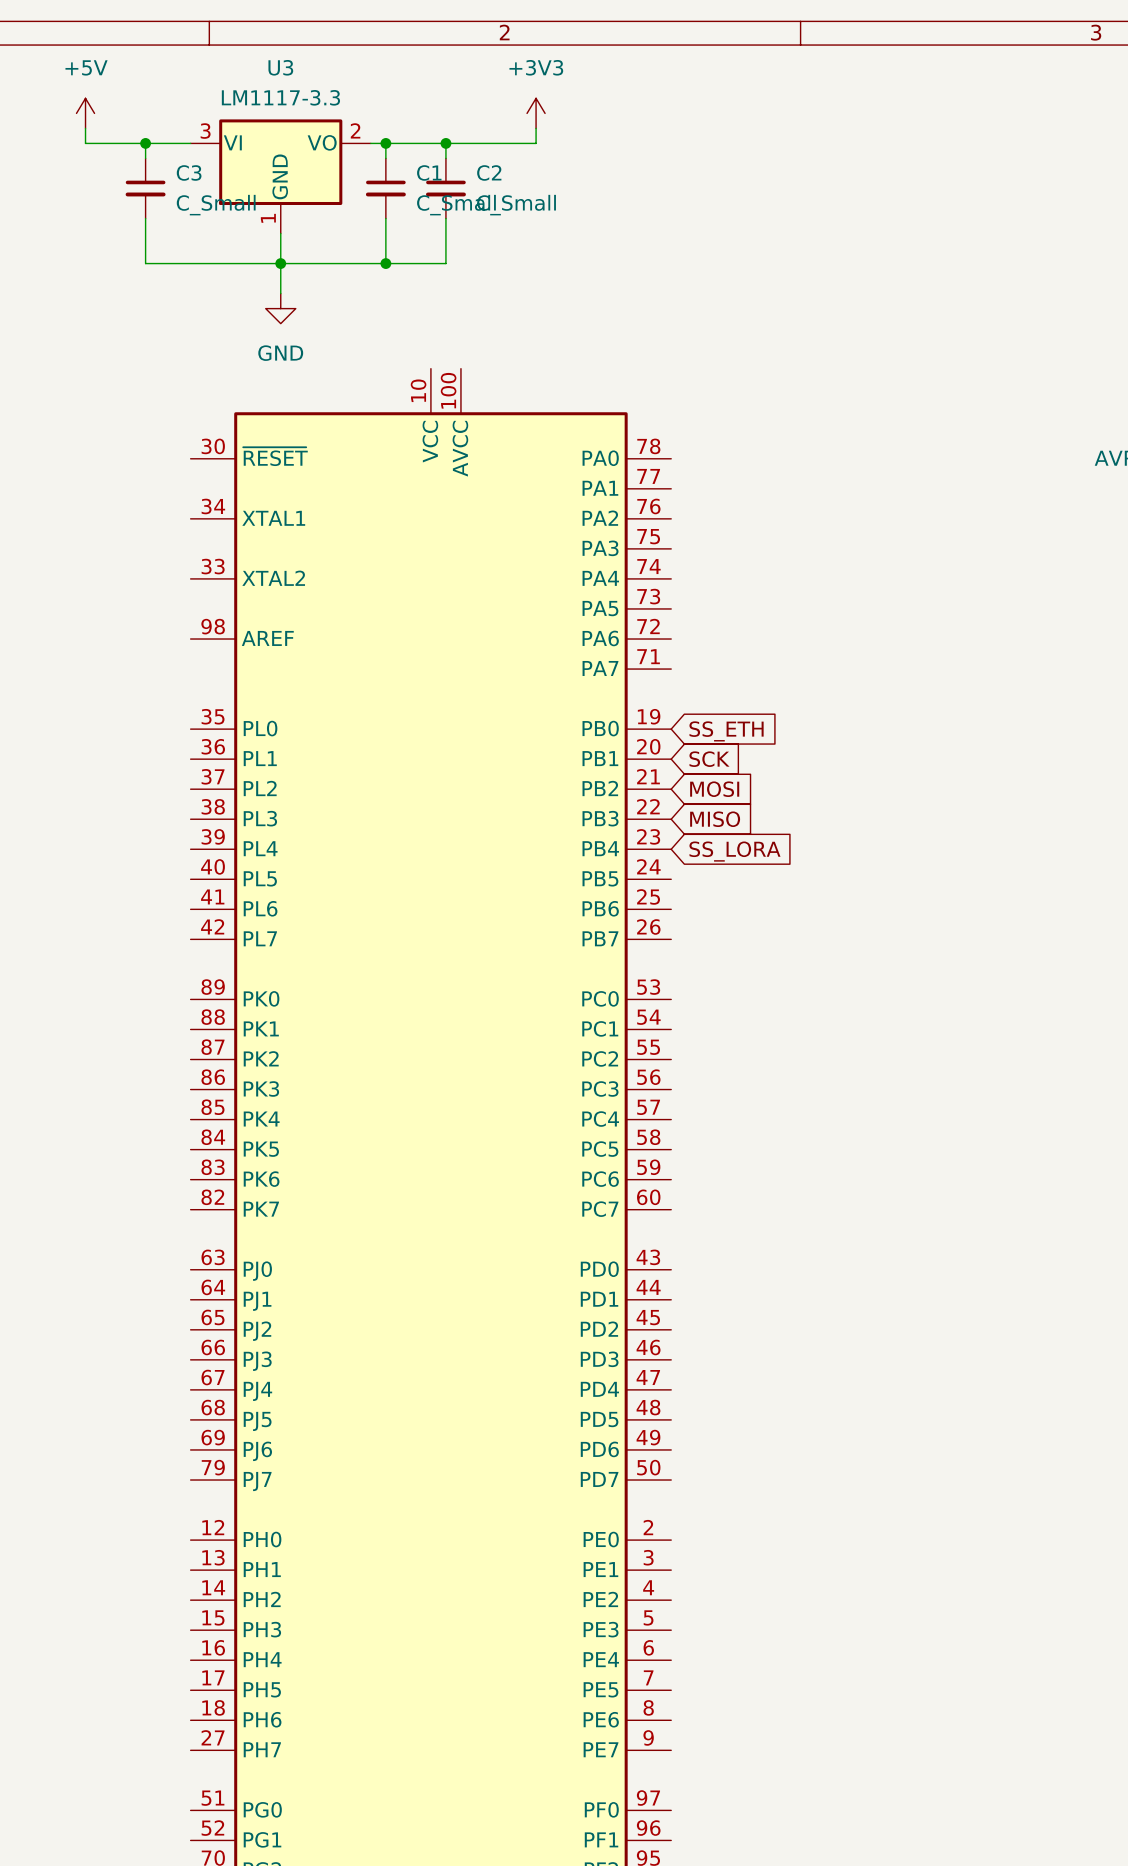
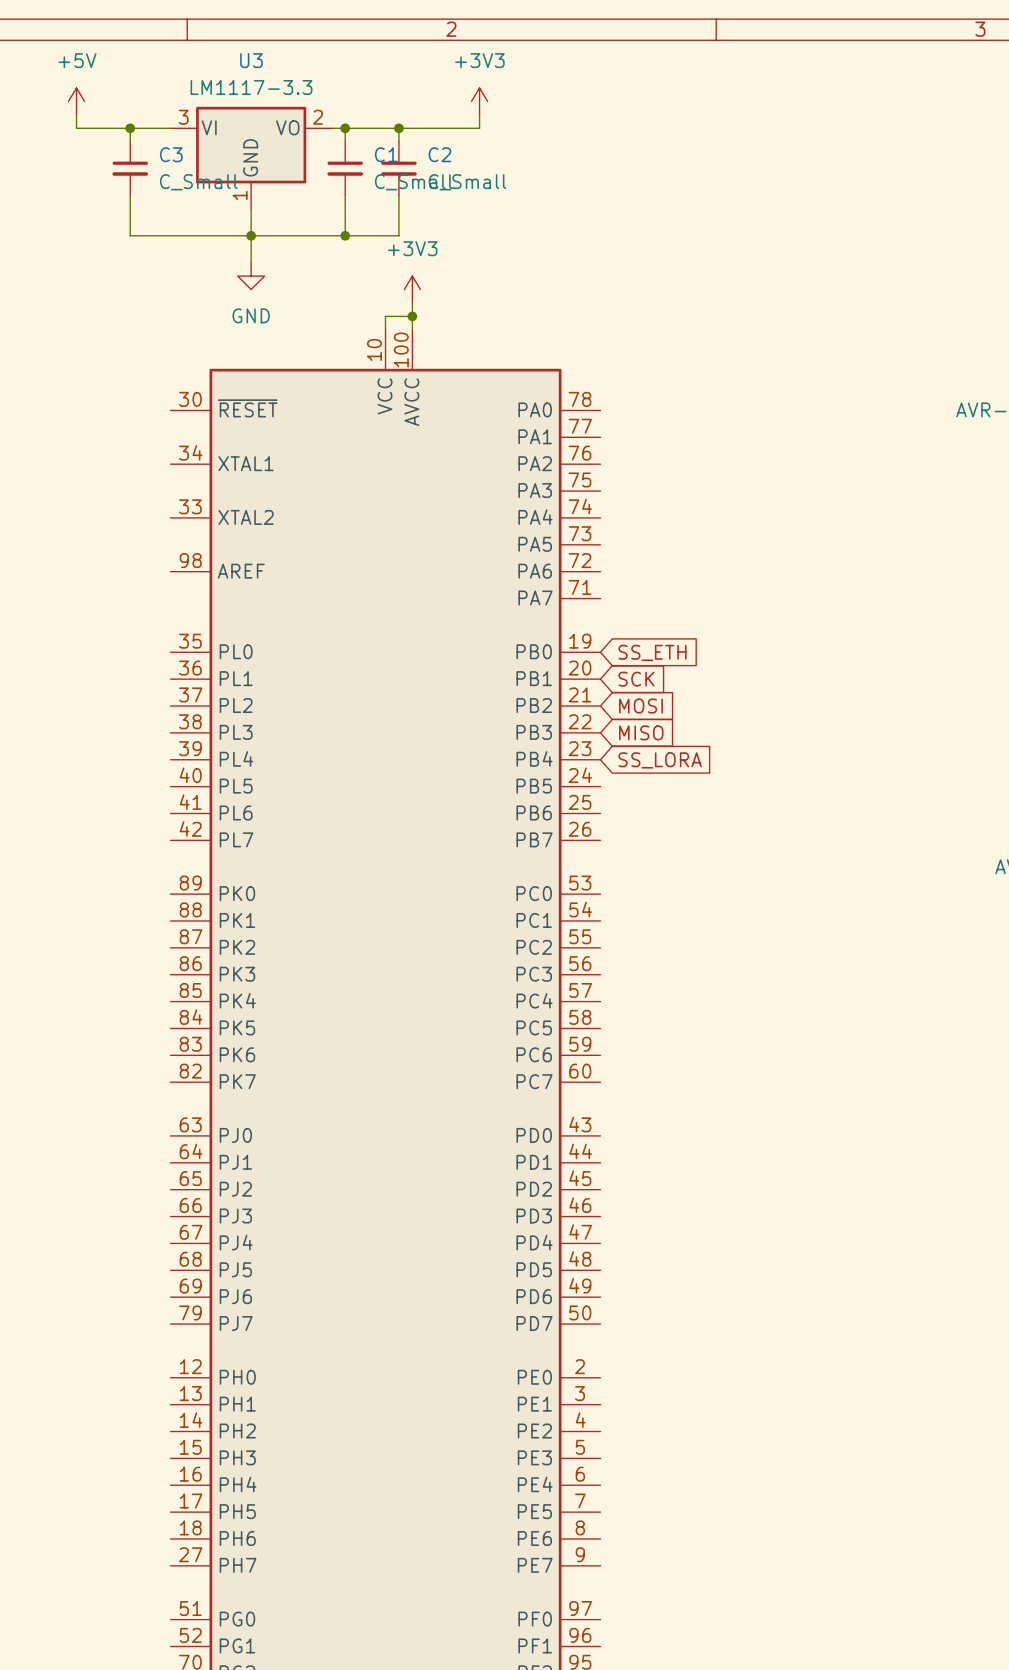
power symbol: none -> +3V3 (412, 289)
wire: none -> (412, 302) (412, 329)
wire: none -> (412, 316) (385, 316) (385, 329)
junction: none -> (412, 316)

